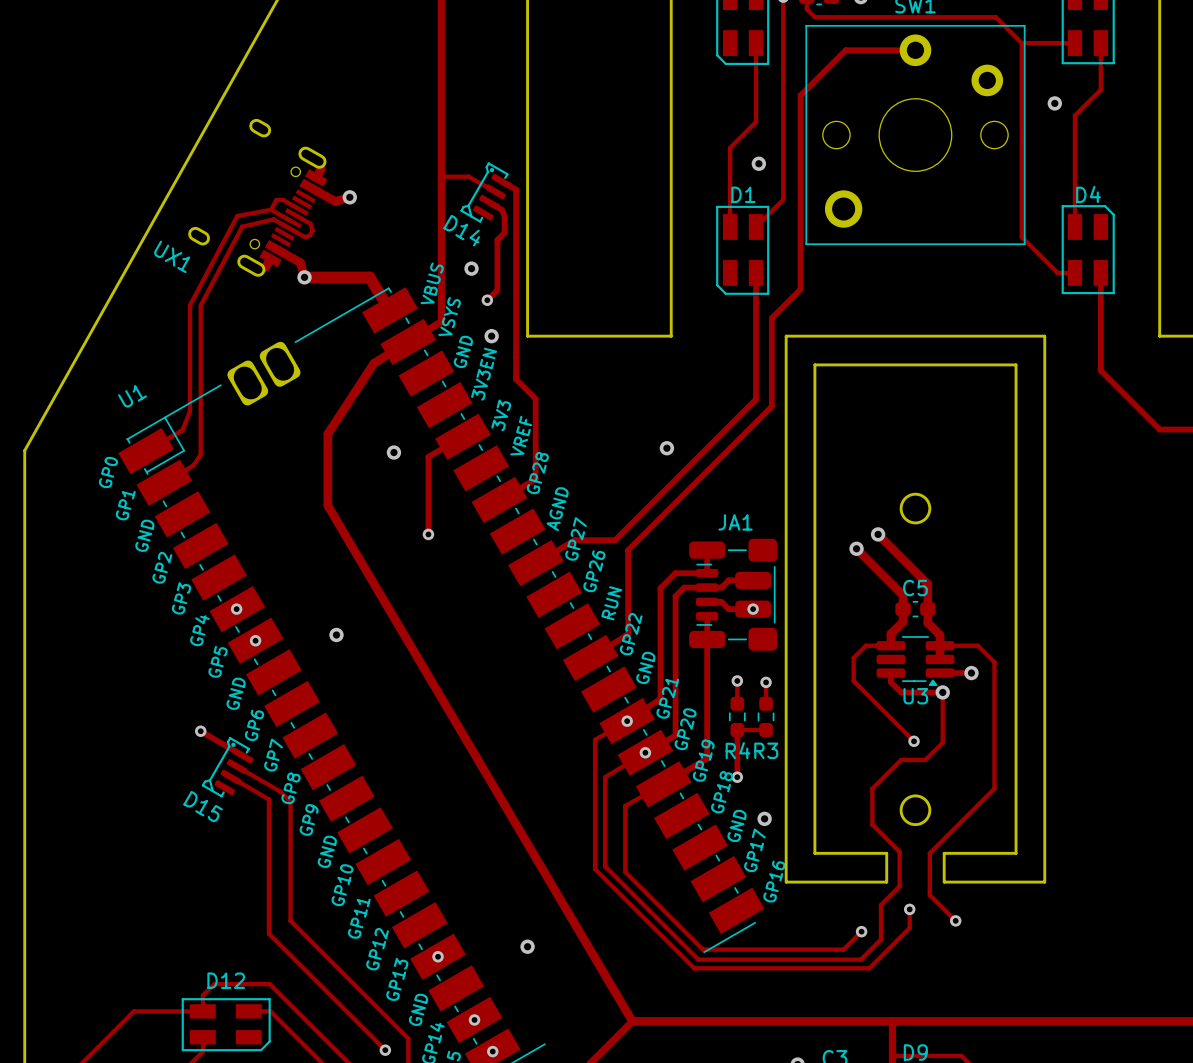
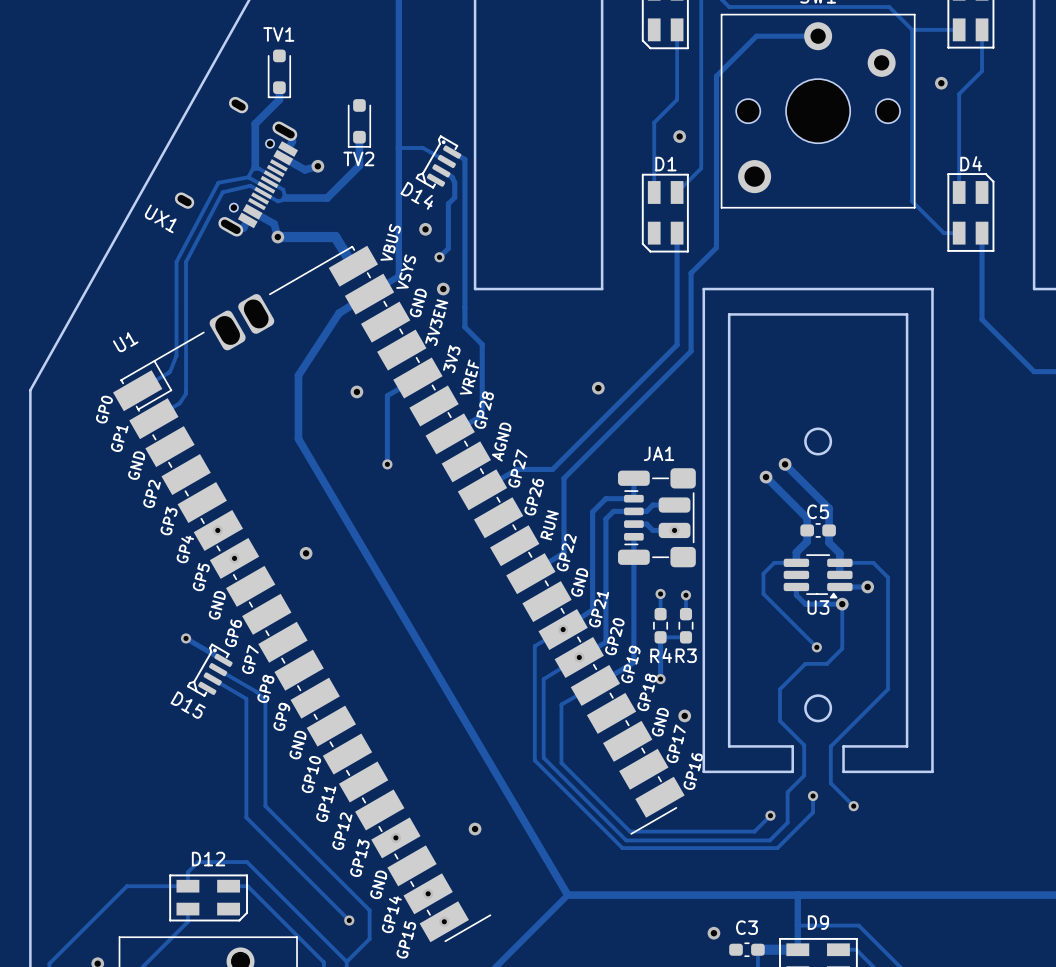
TV1: none -> (279, 73)
track: none -> (279, 87) (279, 99) (255, 123) (255, 167)
TV2: none -> (359, 123)
track: none -> (359, 137) (359, 165) (327, 198) (285, 198)

